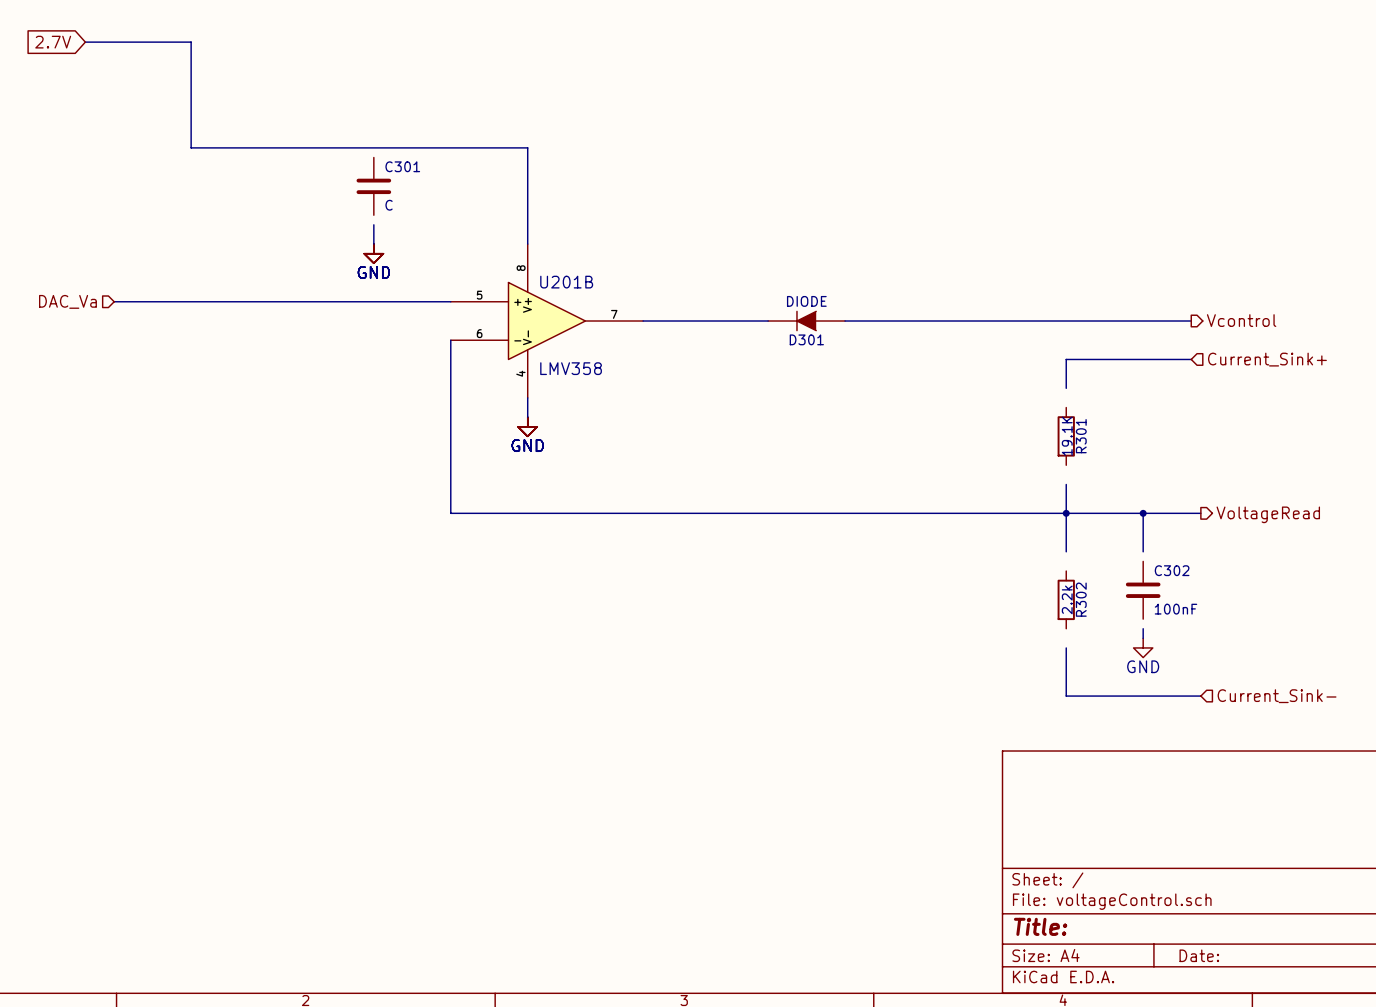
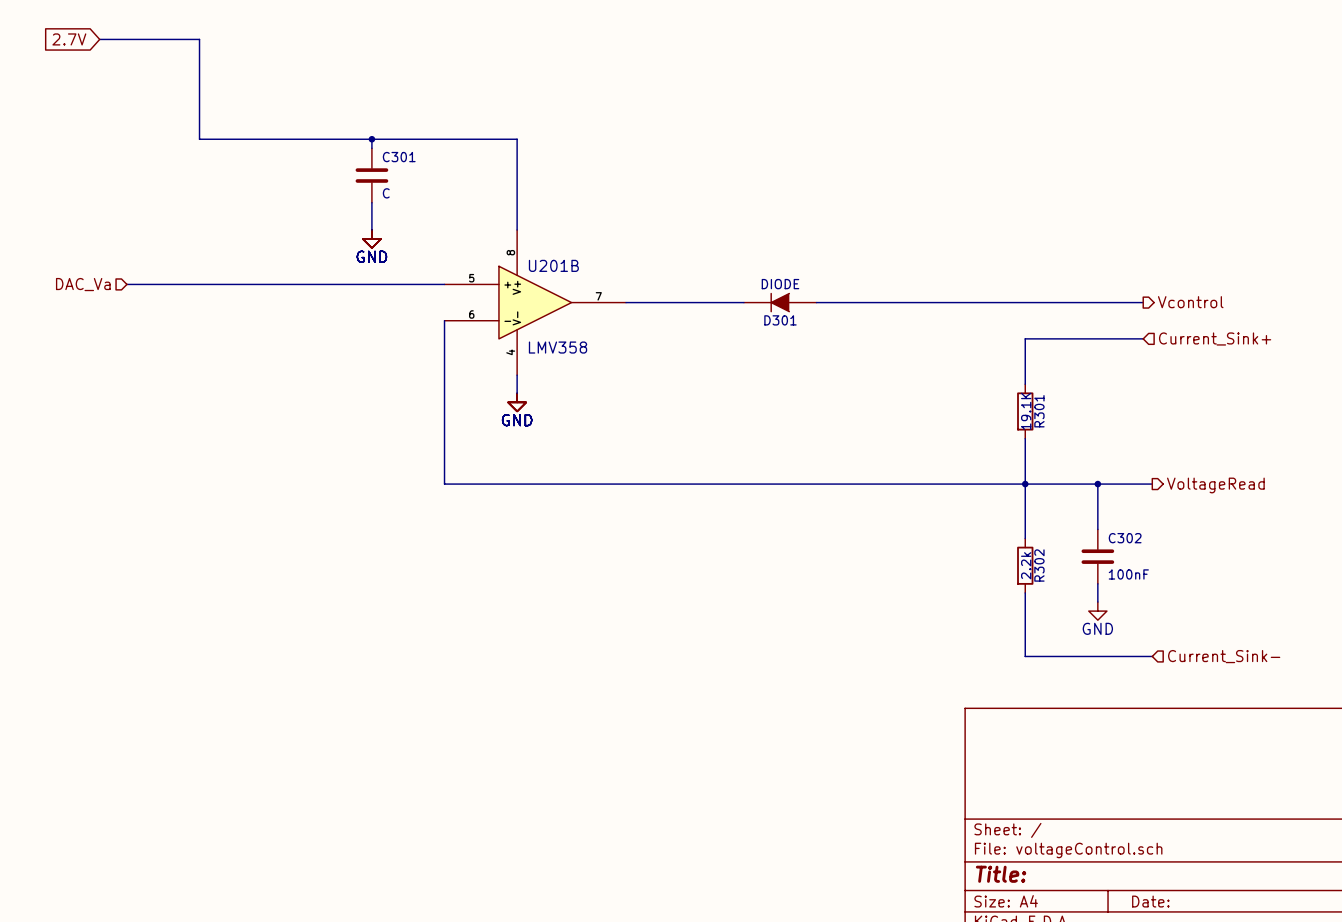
wire: none -> (371, 139) (371, 148)
junction: none -> (371, 139)
wire: none -> (371, 202) (371, 211)
wire: none -> (1025, 366) (1025, 384)
wire: none -> (1025, 438) (1025, 456)
wire: none -> (1025, 520) (1025, 538)
wire: none -> (1097, 520) (1097, 529)
wire: none -> (1097, 583) (1097, 592)
wire: none -> (1025, 592) (1025, 611)

